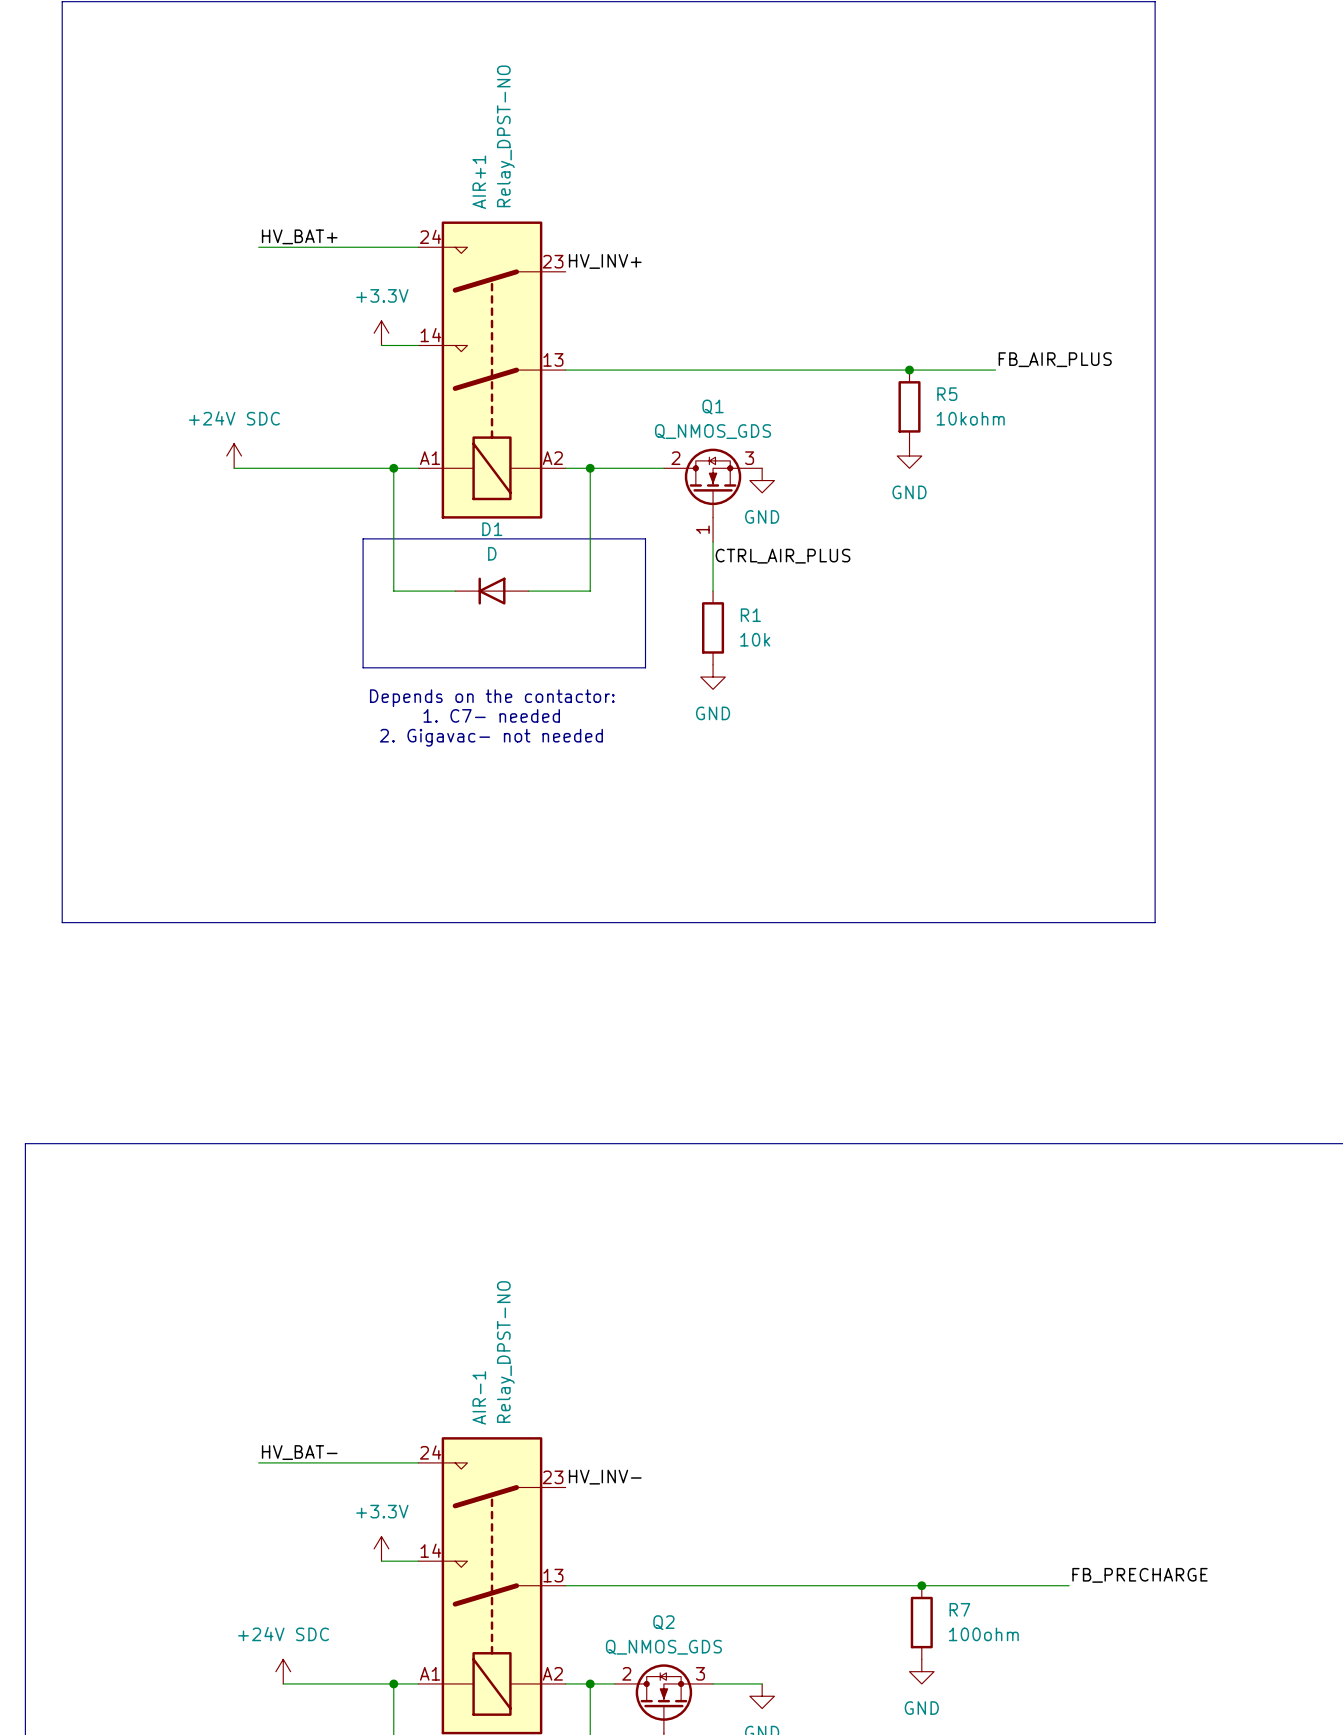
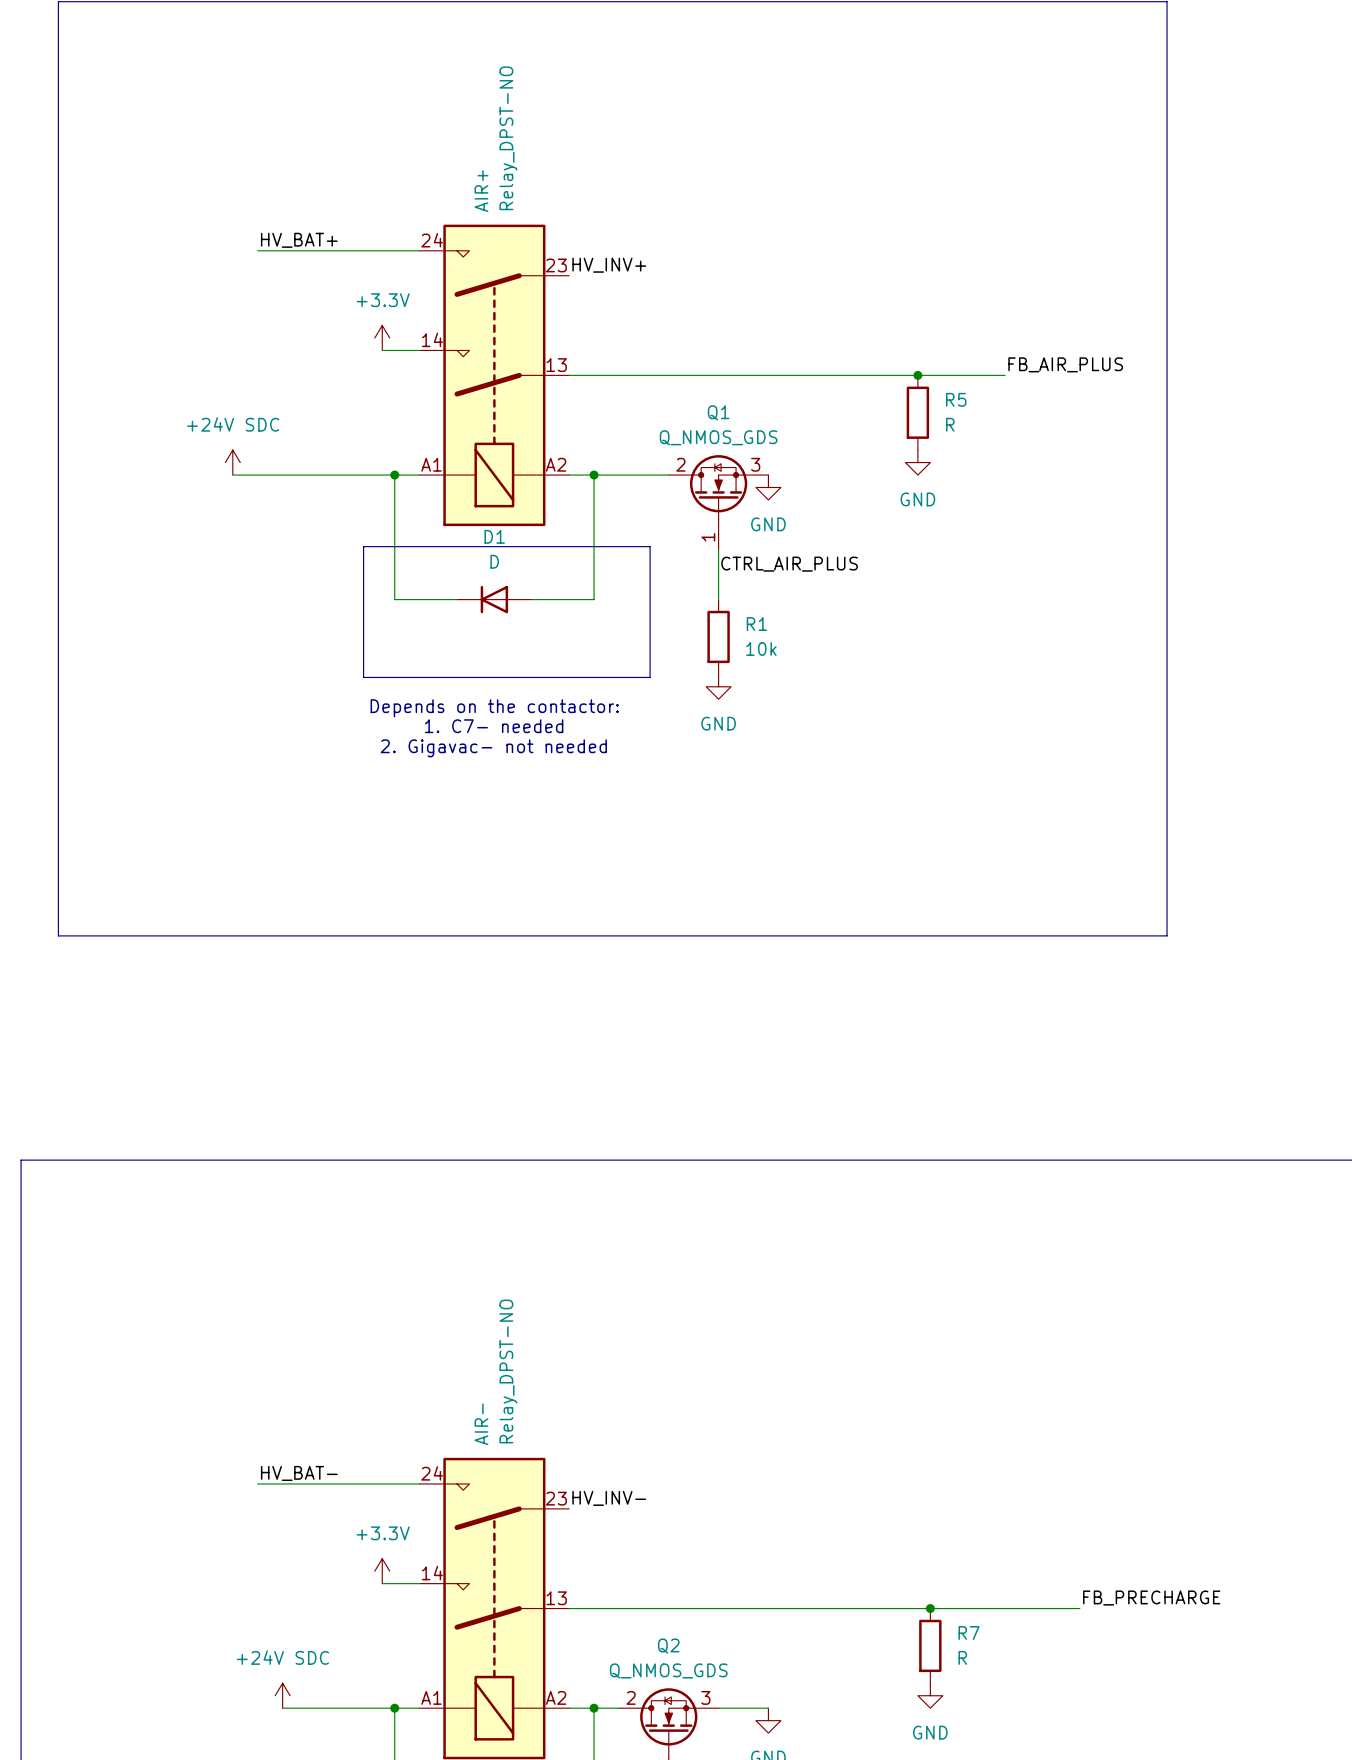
AIR+1 name: AIR+1 (479, 182) -> AIR+ (481, 191)
R5 value: 10kohm (970, 418) -> R (950, 424)
AIR-1 name: AIR-1 (479, 1397) -> AIR- (481, 1424)
R7 value: 100ohm (983, 1634) -> R (962, 1657)

